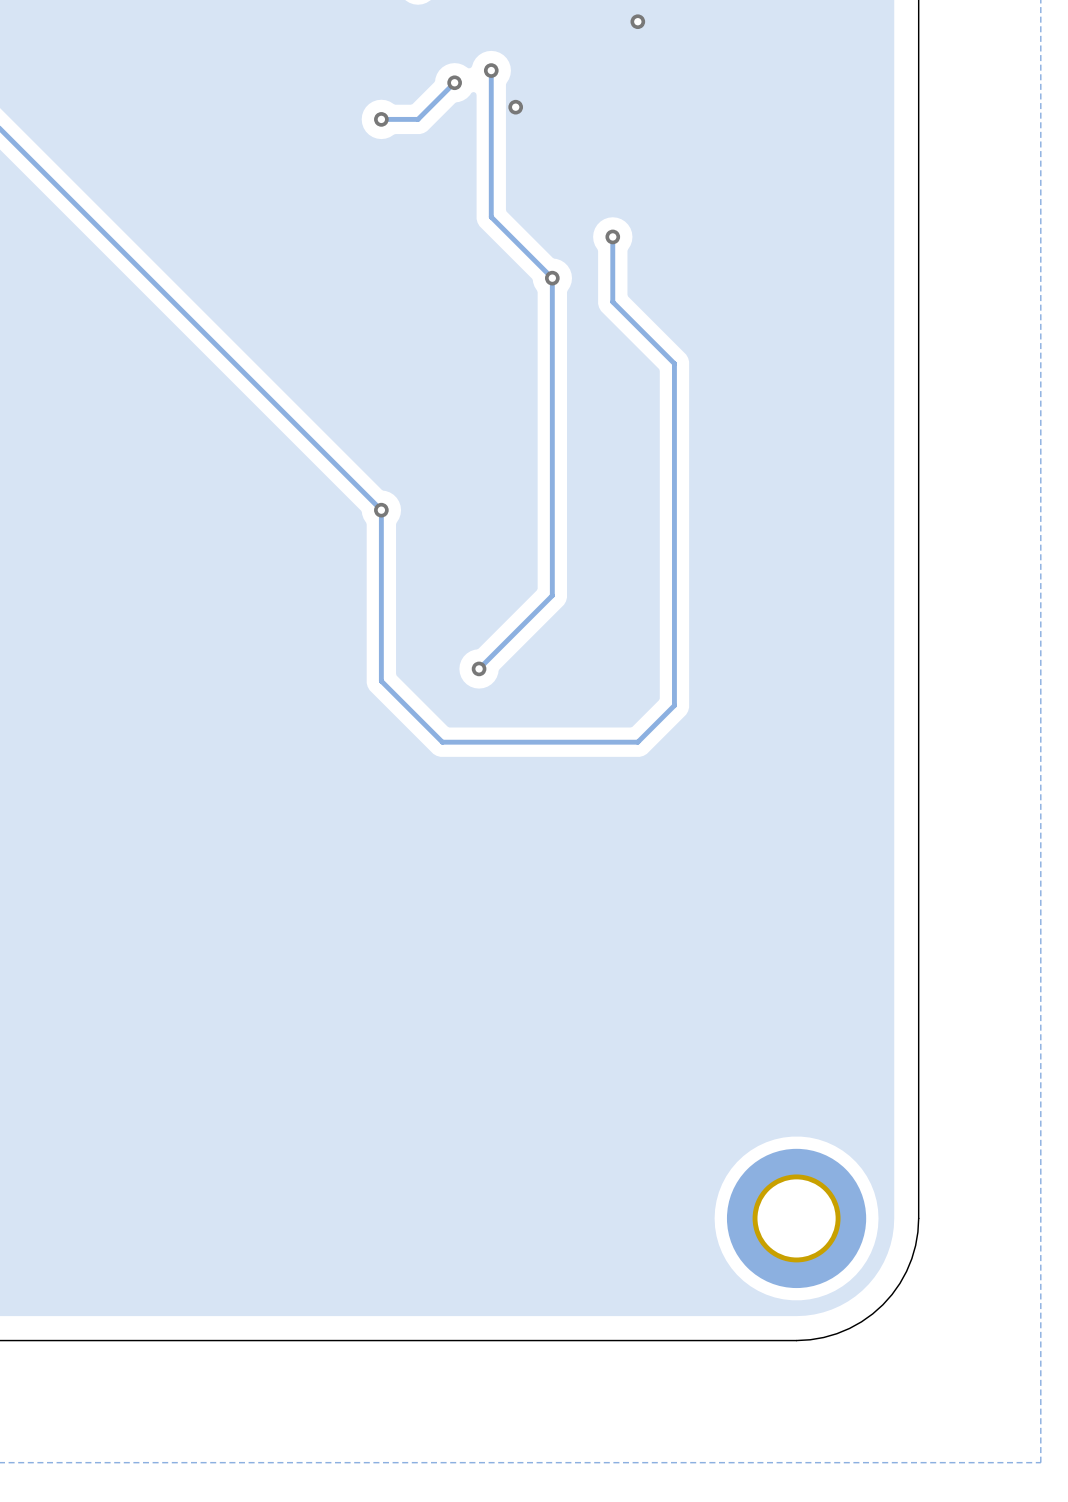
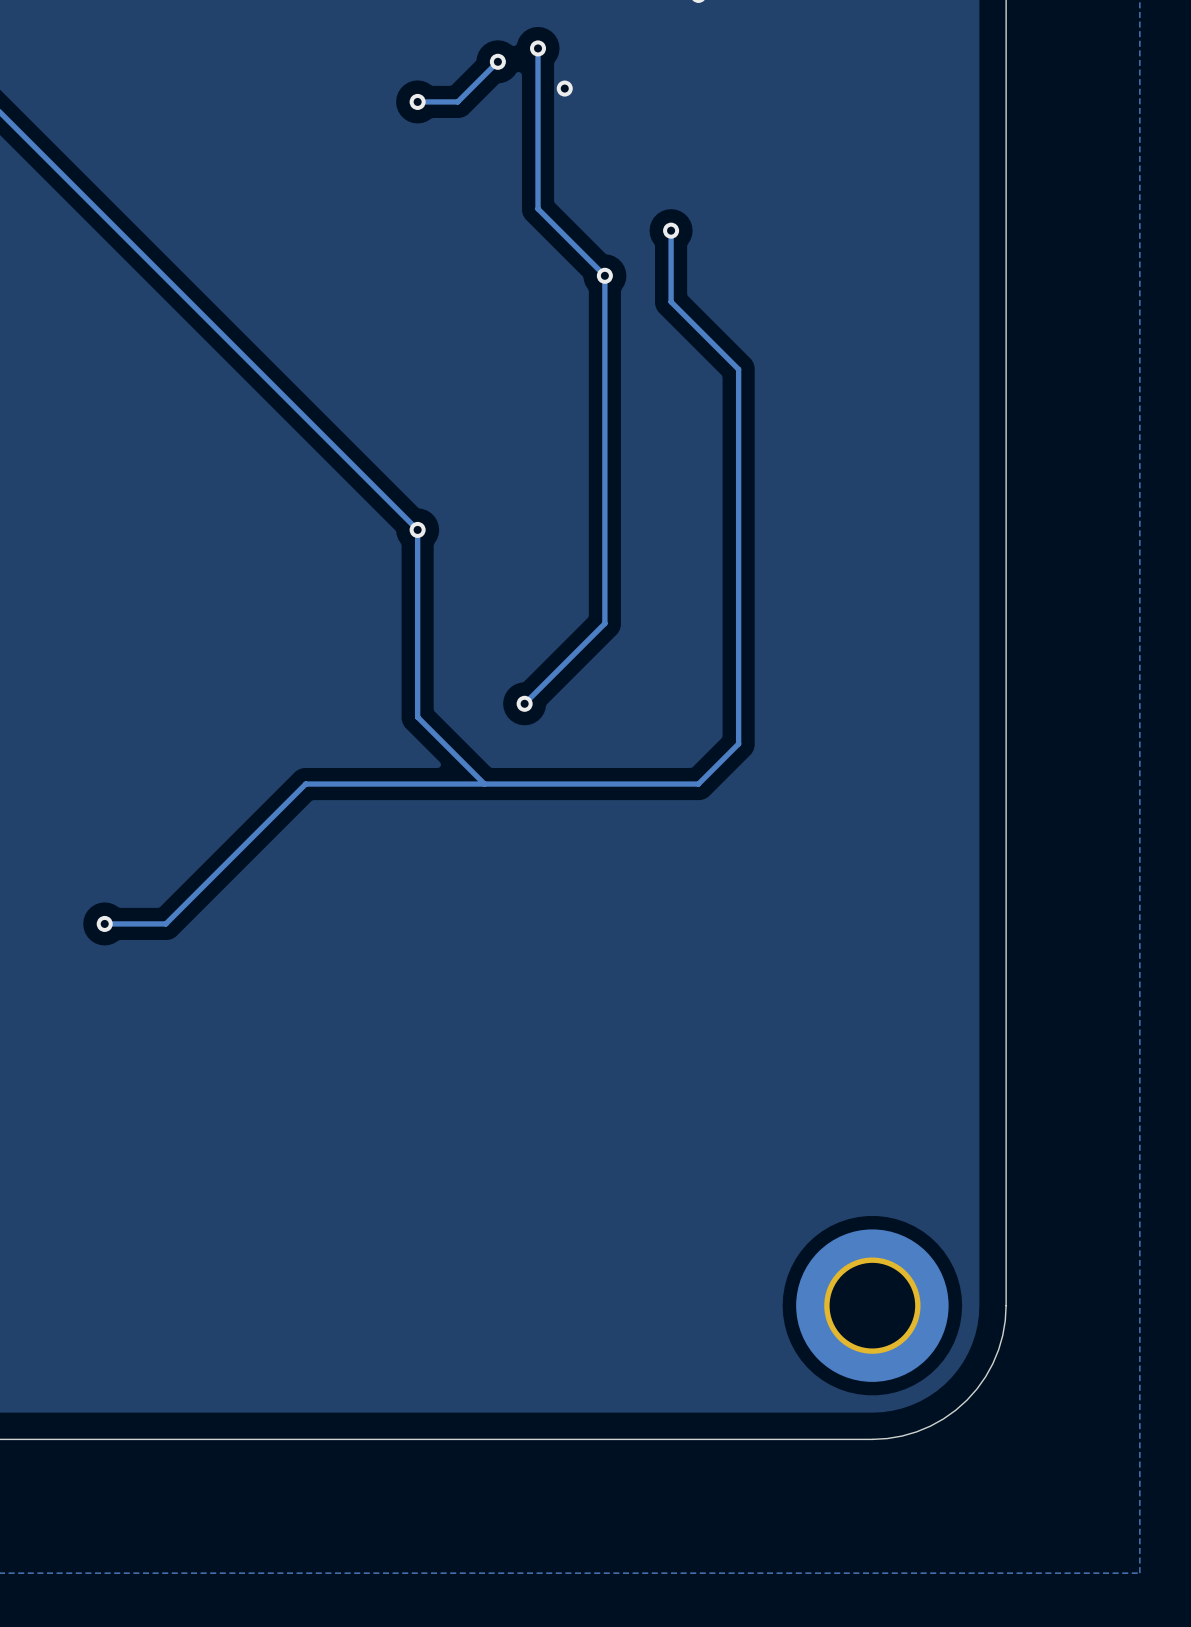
track: none -> (484, 784) (305, 784) (165, 923) (104, 923)
via: none -> (104, 923)

